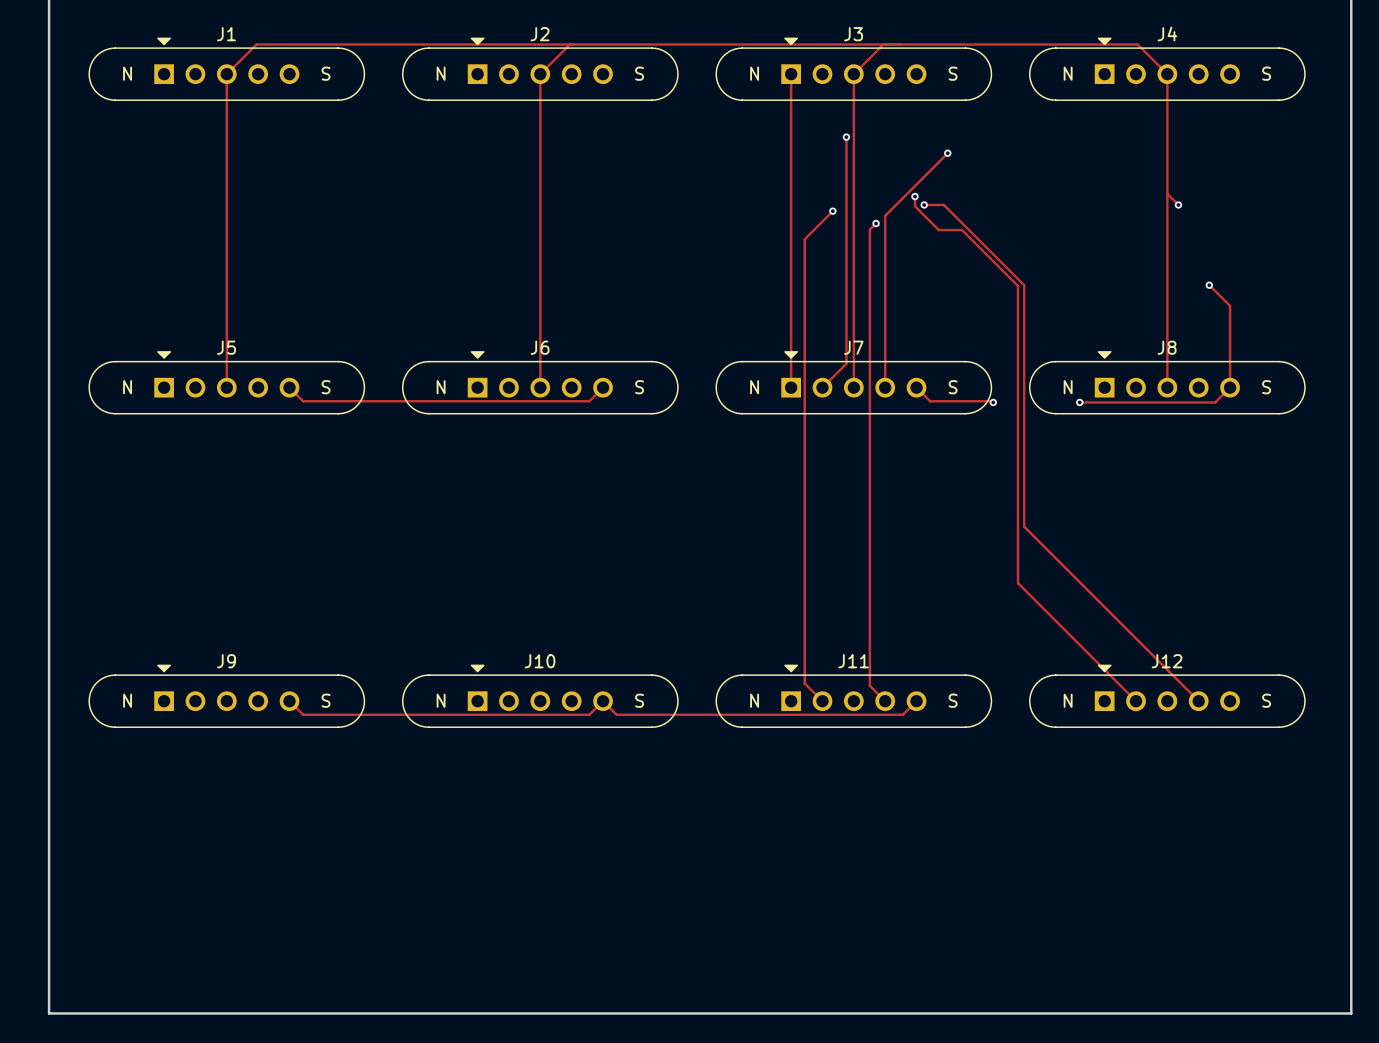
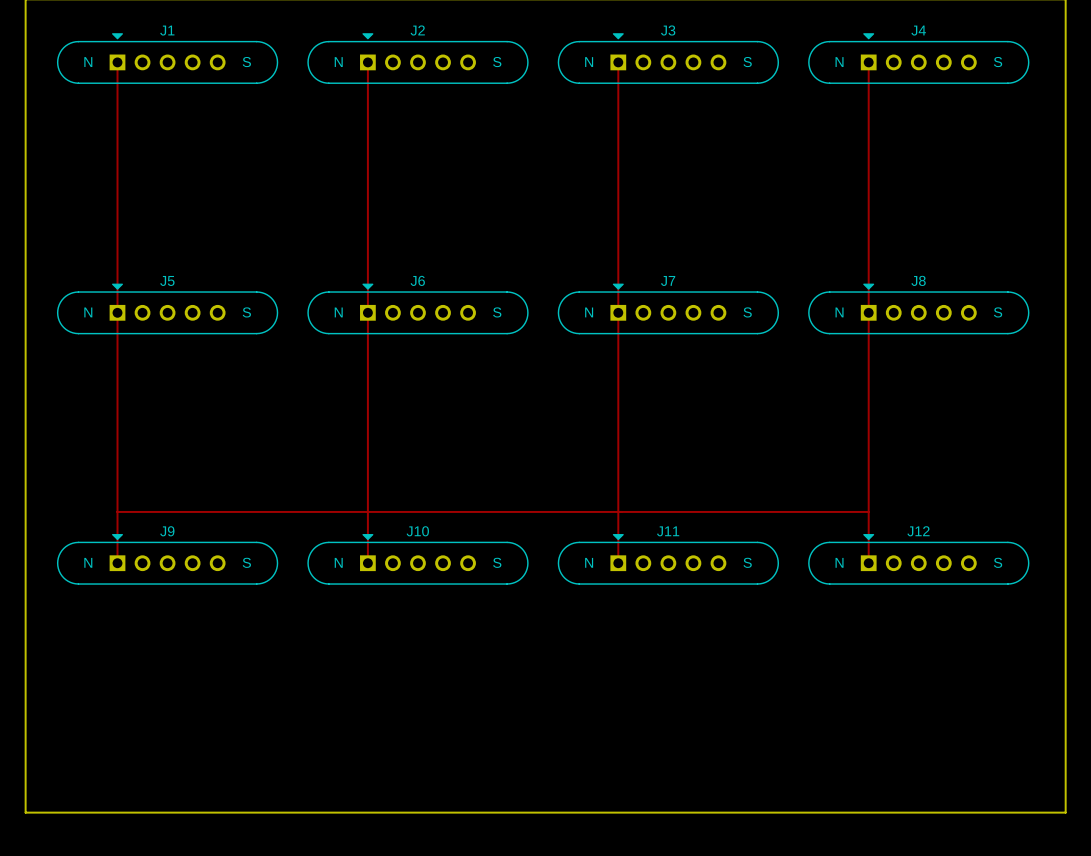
track: (569, 44) (540, 74) (540, 387) -> none
track: (883, 44) (853, 74) (853, 387) -> none
track: none -> (117, 62) (117, 563)
track: none -> (367, 62) (367, 563)
track: none -> (868, 62) (868, 563)
track: (846, 137) (846, 363) (822, 387) -> none
via: (846, 137) -> none
track: (947, 153) (885, 215) (885, 387) -> none
via: (947, 153) -> none
track: (1167, 193) (1178, 204) -> none
track: (915, 196) (915, 206) (938, 230) (962, 230) (1018, 286) (1018, 583) (1136, 701) -> none
via: (915, 196) -> none
track: (924, 204) (943, 204) (1024, 285) (1024, 526) (1198, 701) -> none
via: (924, 204) -> none
via: (1178, 204) -> none
track: (832, 211) (804, 239) (804, 683) (822, 701) -> none
via: (832, 211) -> none
track: (876, 223) (869, 229) (869, 685) (885, 701) -> none
via: (876, 223) -> none
track: (1209, 285) (1230, 305) (1230, 387) (1215, 402) (1079, 402) -> none
via: (1209, 285) -> none
track: (226, 387) (226, 74) (256, 44) (1137, 44) (1167, 74) (1167, 387) -> none
track: (289, 387) (303, 401) (589, 401) (603, 387) -> none
track: none -> (618, 312) (618, 563)
track: (916, 387) (930, 401) (993, 402) -> none
via: (993, 402) -> none
via: (1079, 402) -> none
track: none -> (117, 511) (868, 511)
track: (289, 701) (303, 714) (589, 714) (603, 701) (616, 714) (902, 714) (916, 701) -> none

